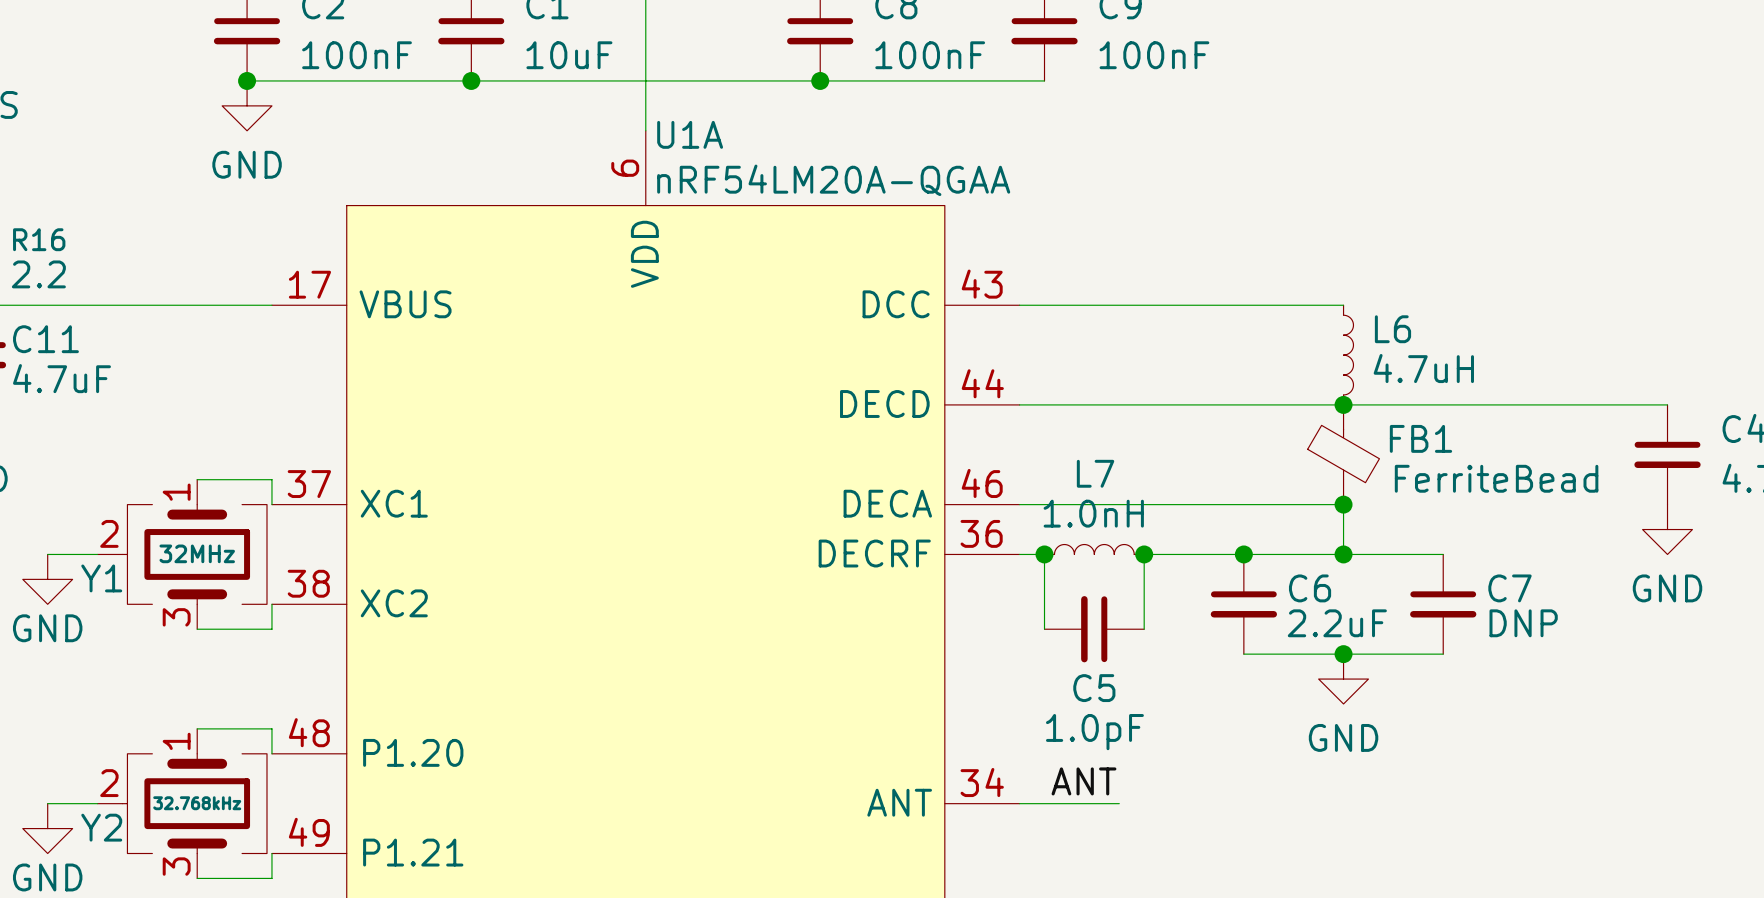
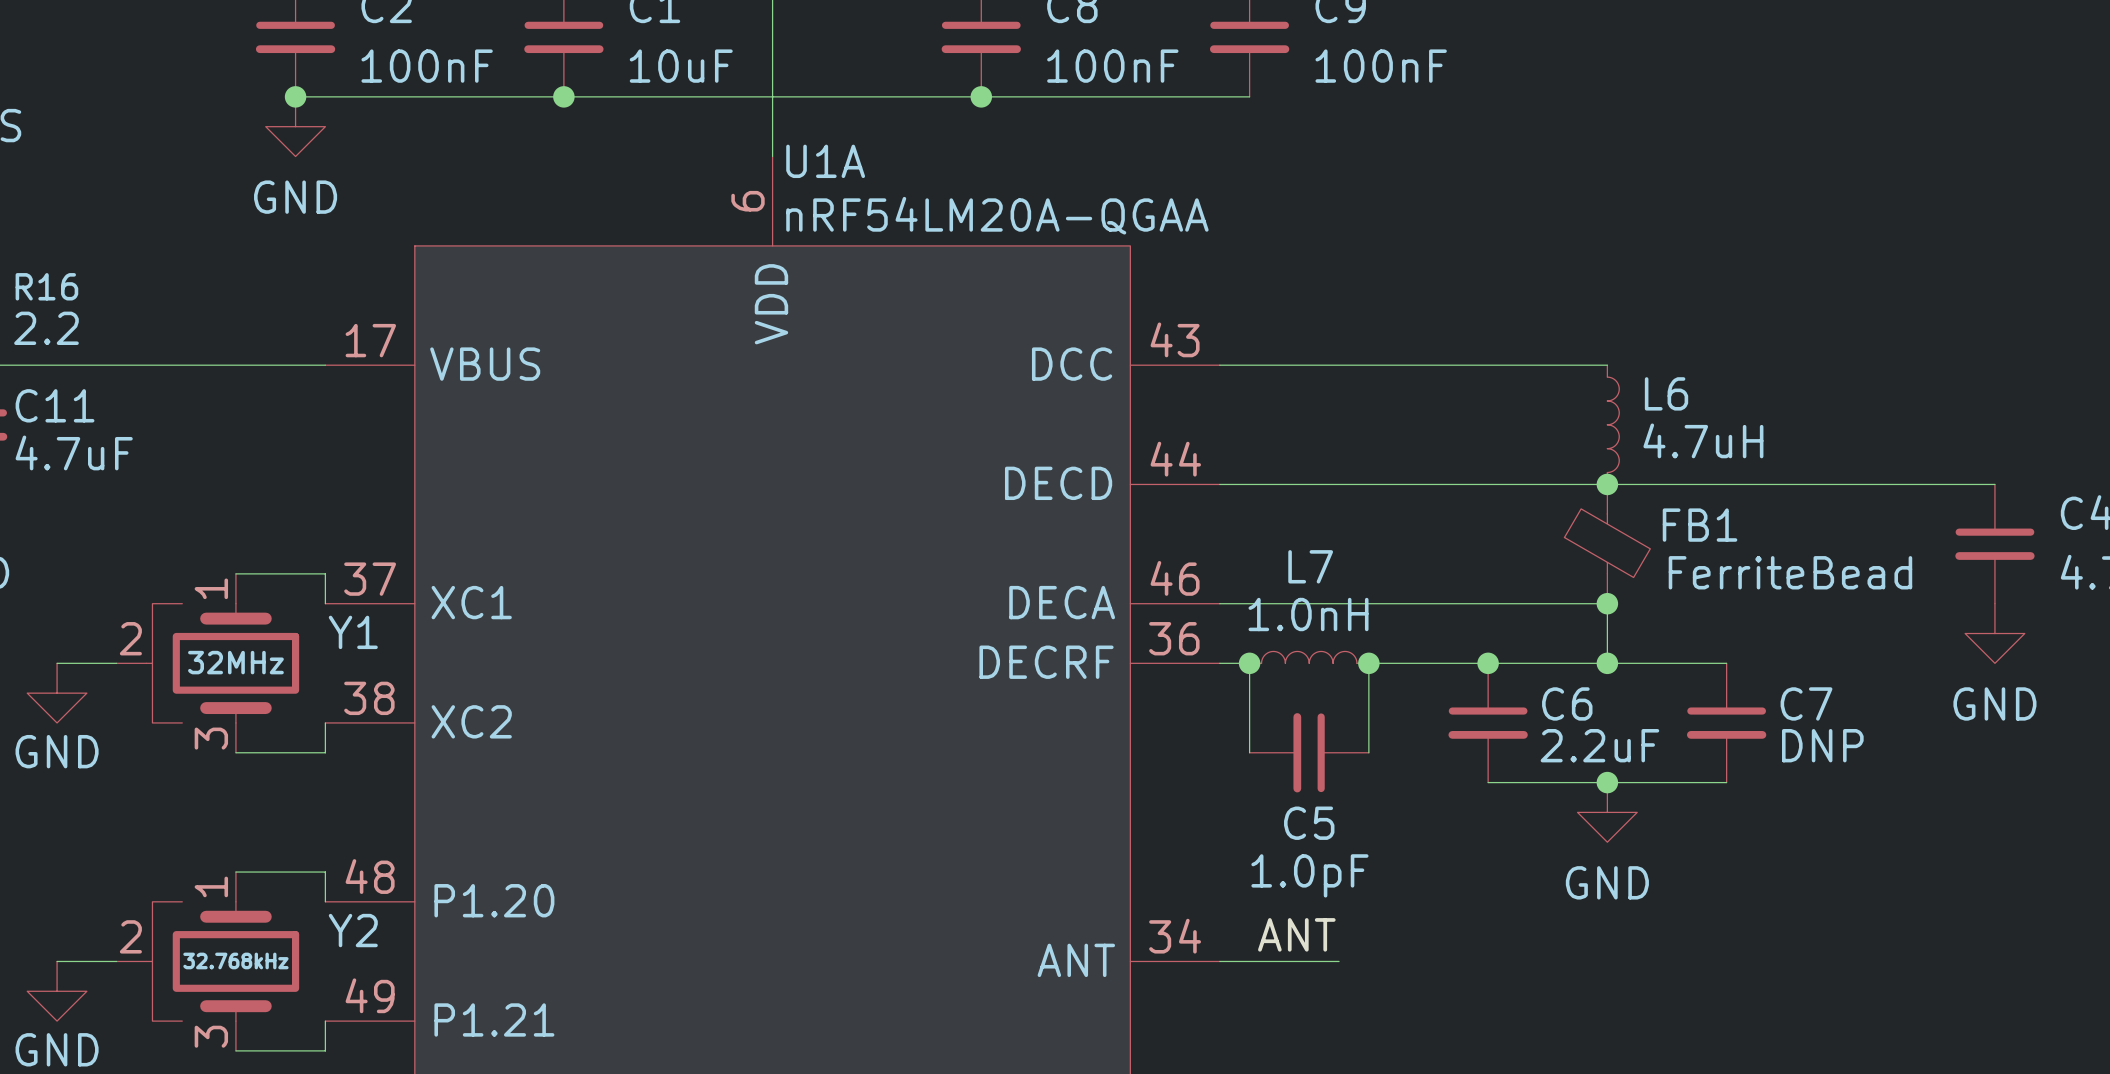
Y1 symbol: [97, 479, 267, 630] -> [116, 573, 300, 753]
Y1 name position: Y1 (101, 578) -> Y1 (353, 632)
Y2 symbol: [97, 728, 267, 879] -> [116, 872, 300, 1051]
Y2 name position: Y2 (101, 827) -> Y2 (353, 930)

